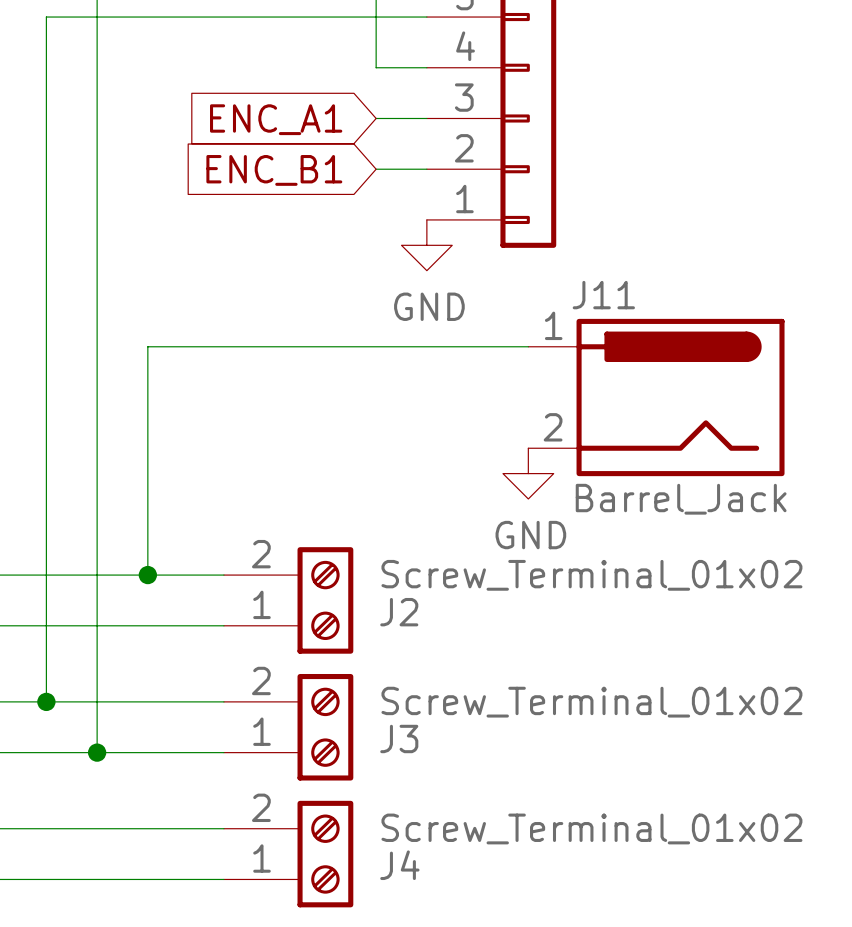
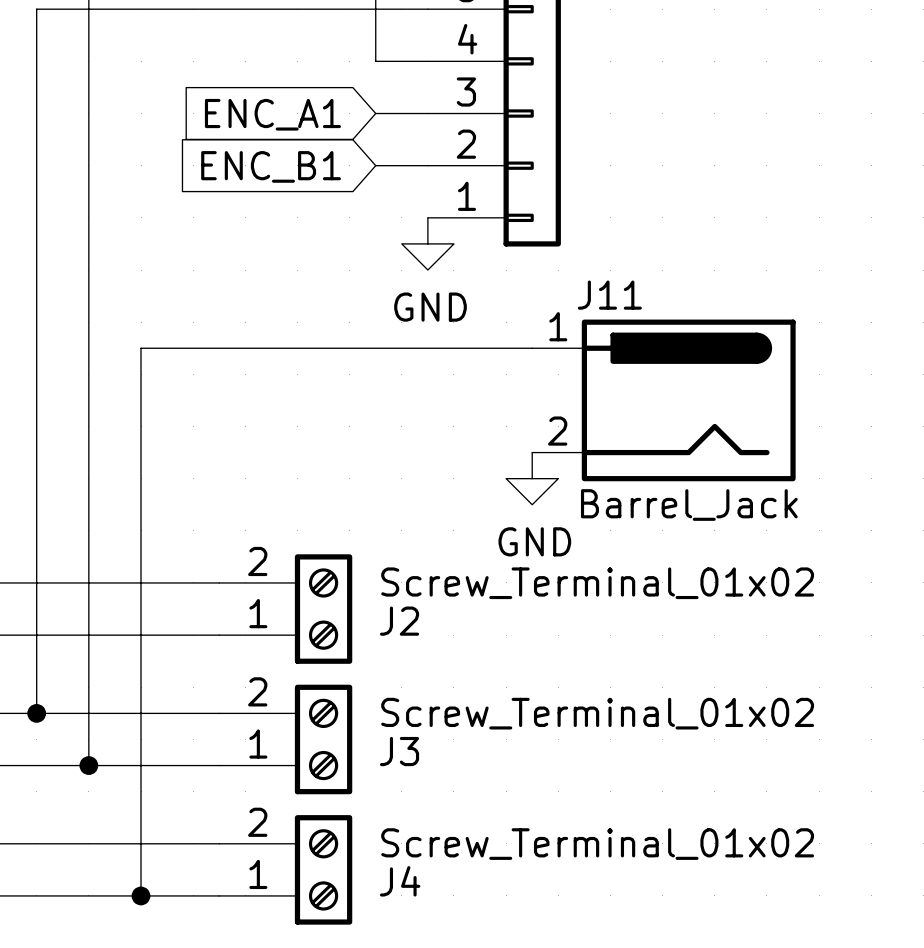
wire: none -> (141, 582) (141, 895)
junction: (147, 575) -> none
junction: none -> (141, 895)

